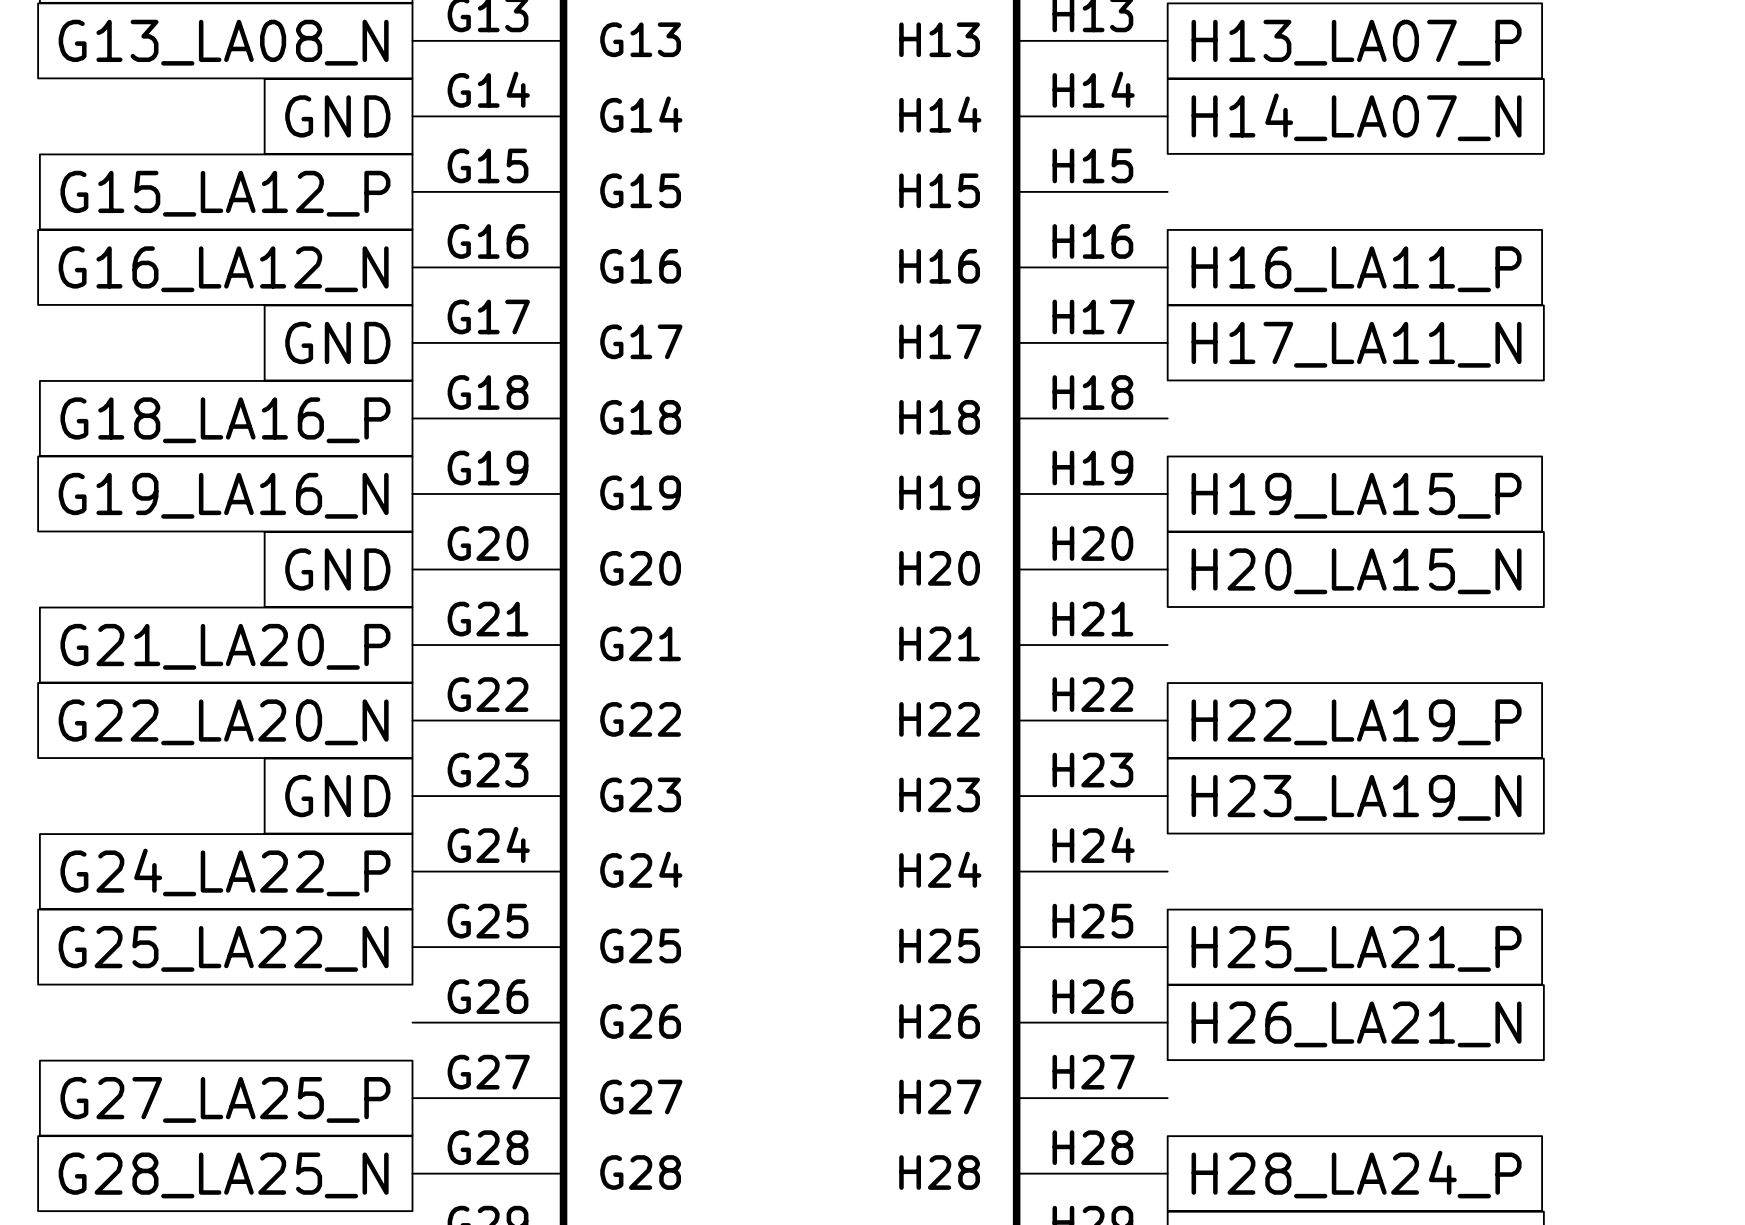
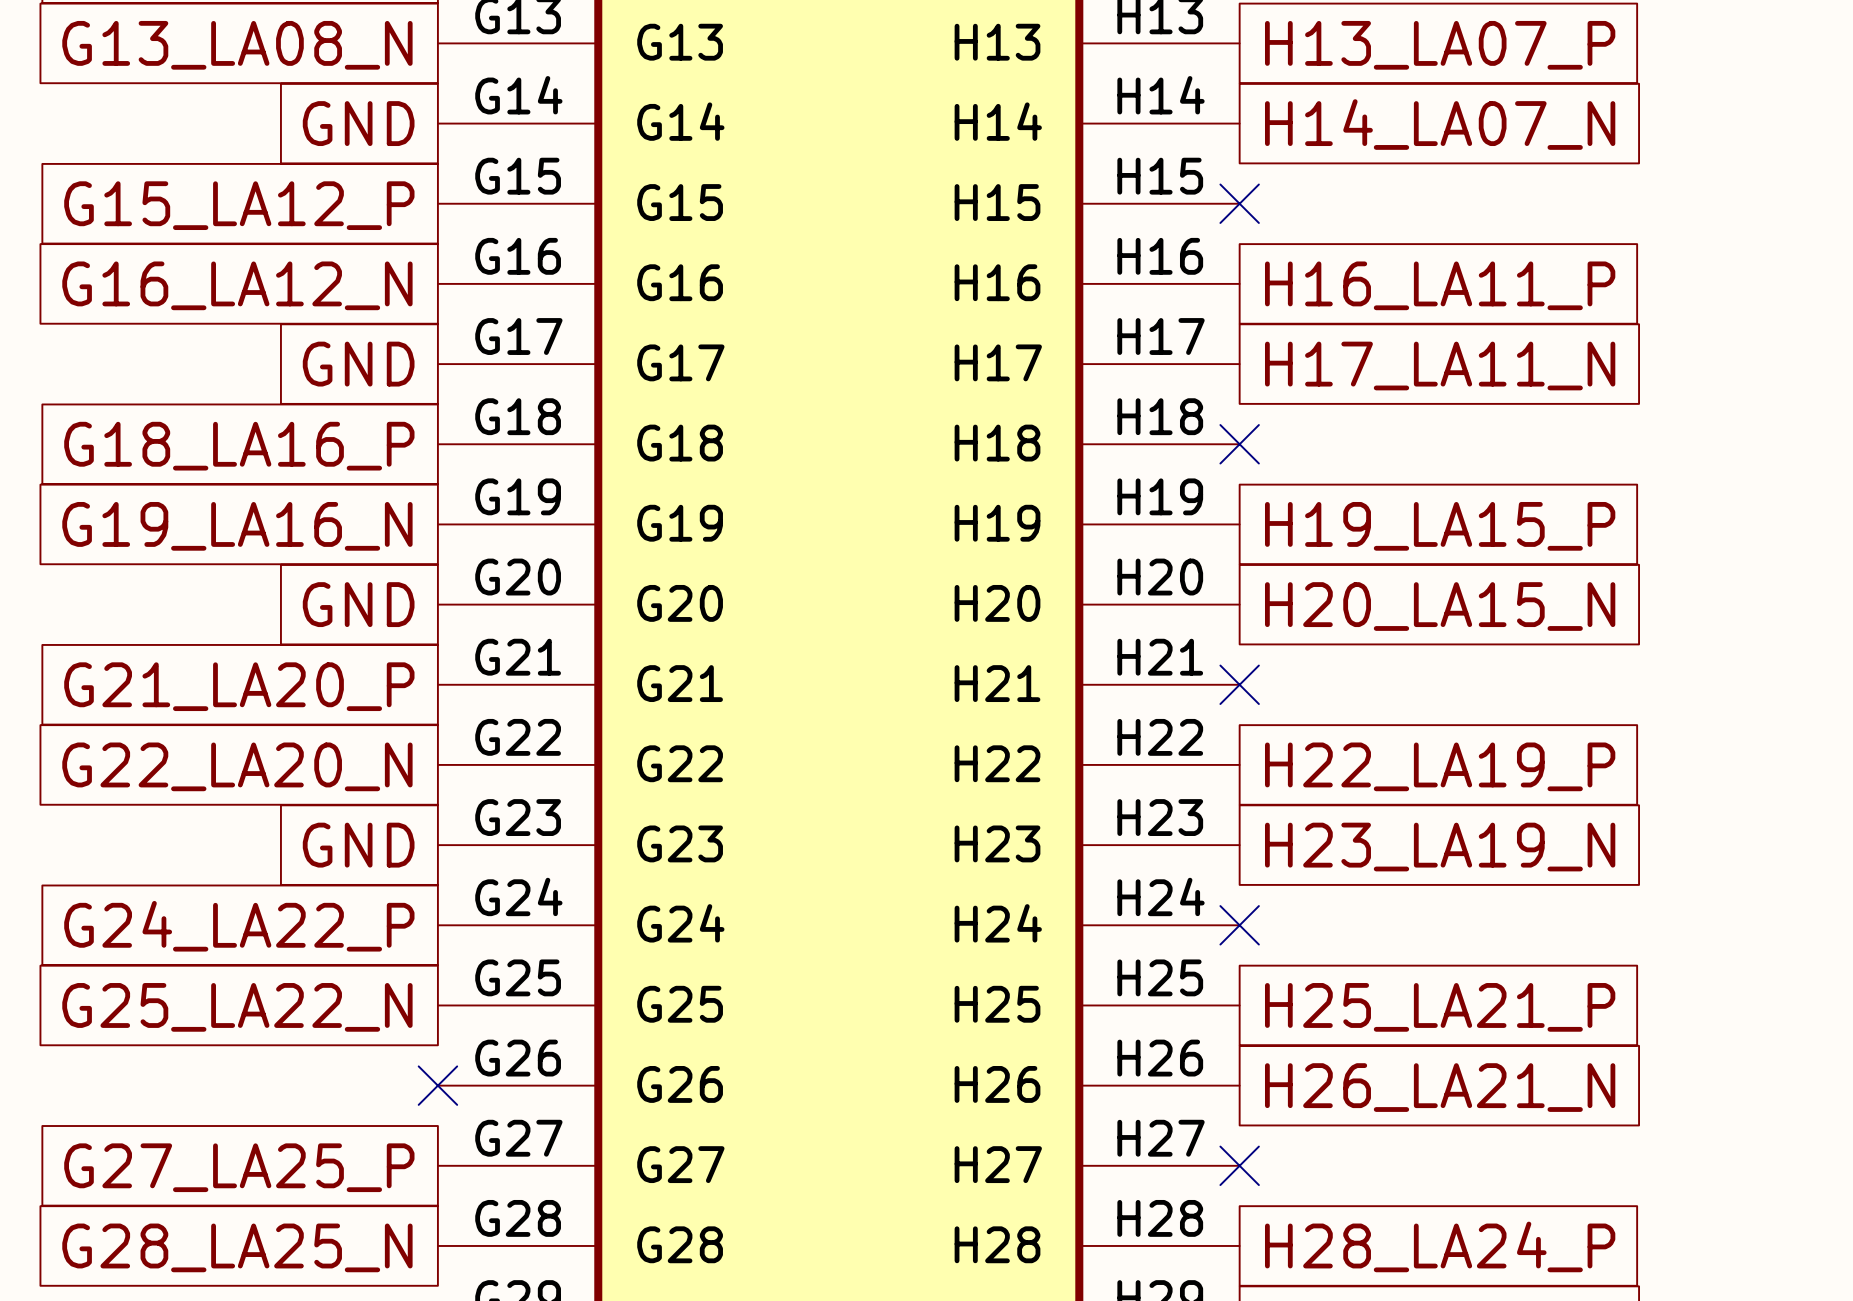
no-connect mark: none -> (1239, 203)
no-connect mark: none -> (1239, 444)
no-connect mark: none -> (1239, 684)
no-connect mark: none -> (1239, 925)
no-connect mark: none -> (437, 1085)
no-connect mark: none -> (1239, 1165)

